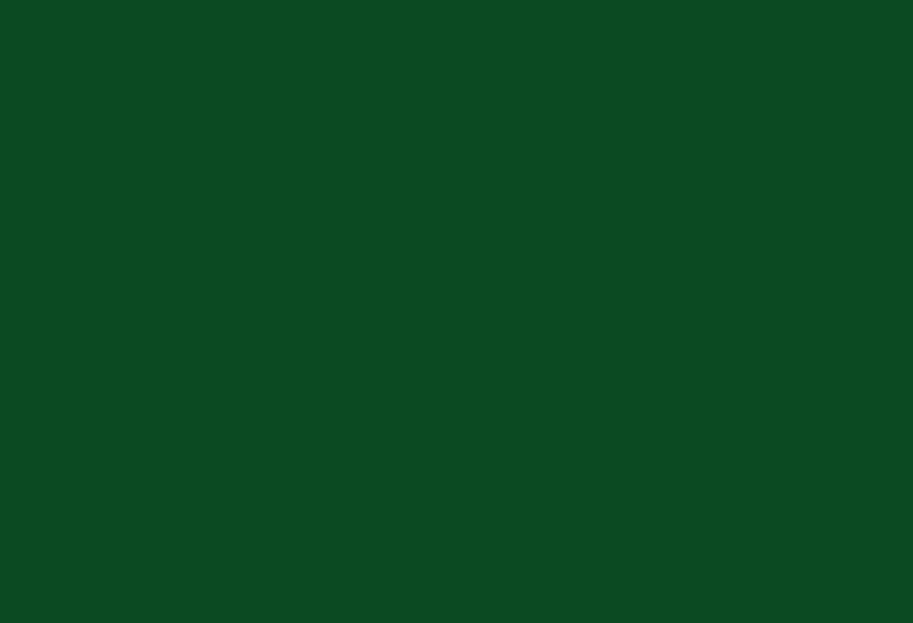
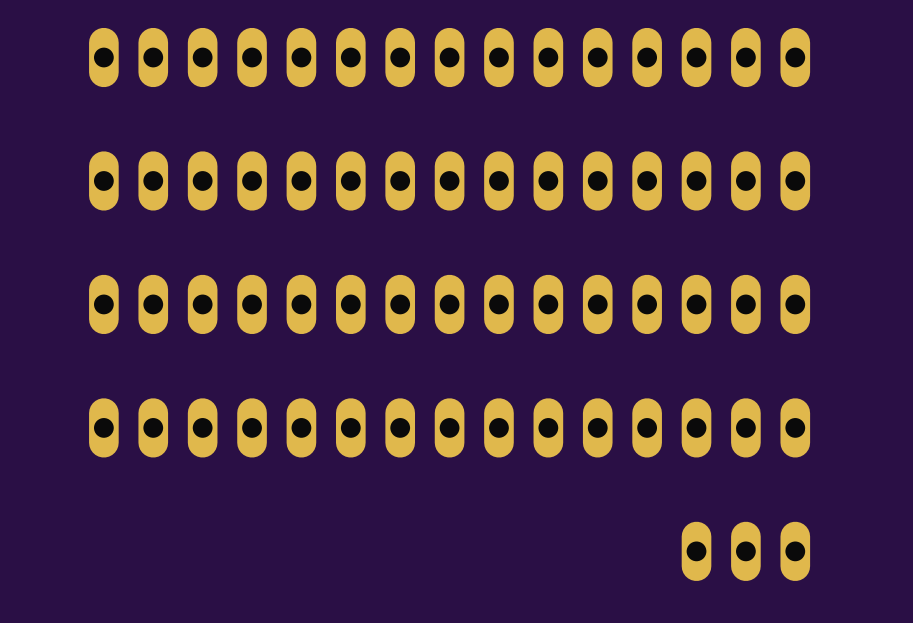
part: none -> (449, 57)
part: none -> (449, 180)
part: none -> (449, 304)
part: none -> (449, 427)
part: none -> (745, 551)

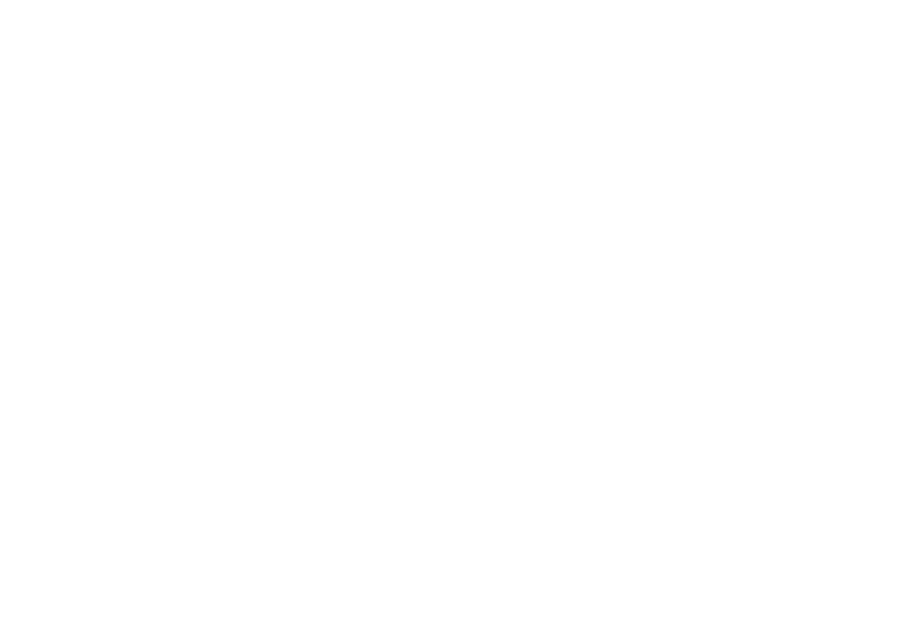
part: (449, 57) -> none
part: (449, 180) -> none
part: (449, 304) -> none
part: (449, 427) -> none
part: (745, 551) -> none

